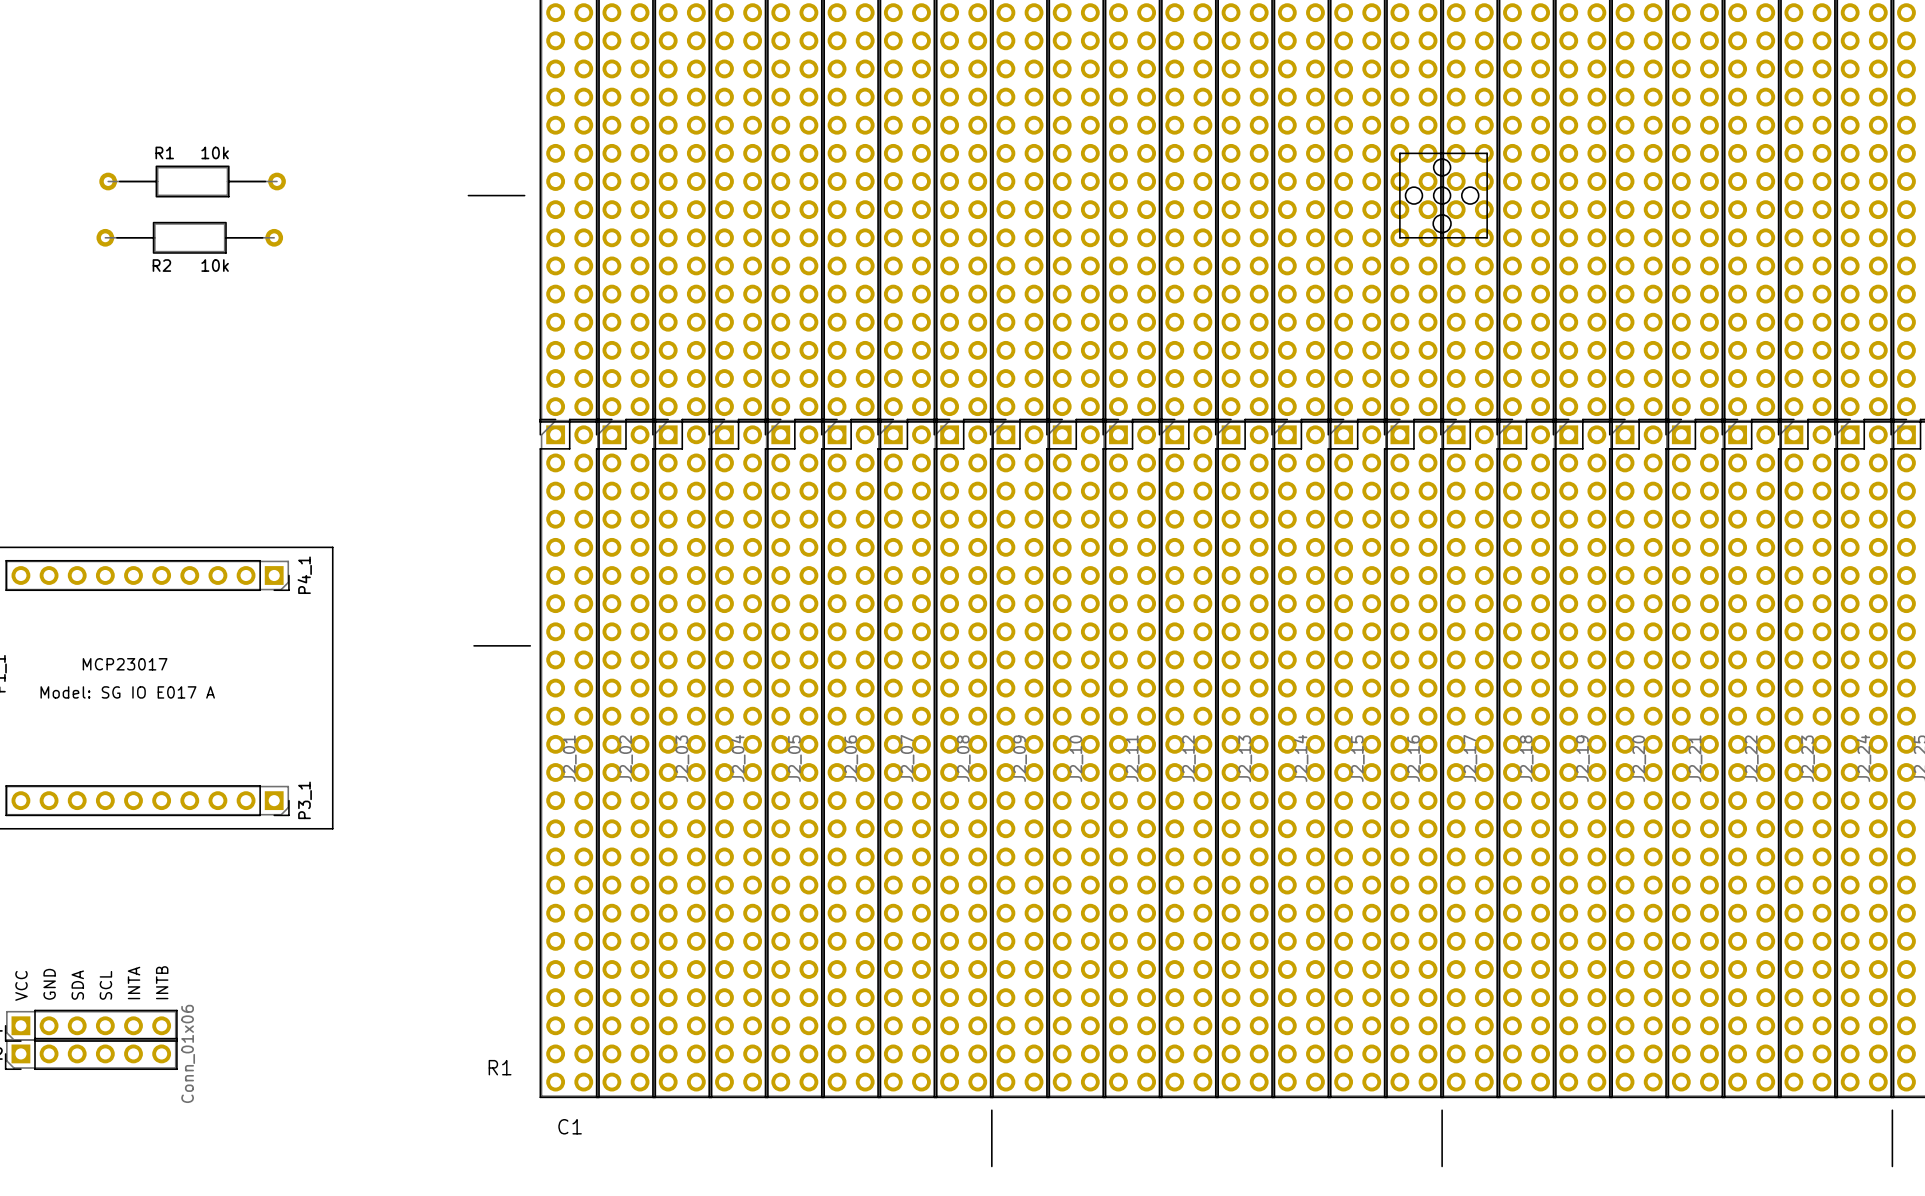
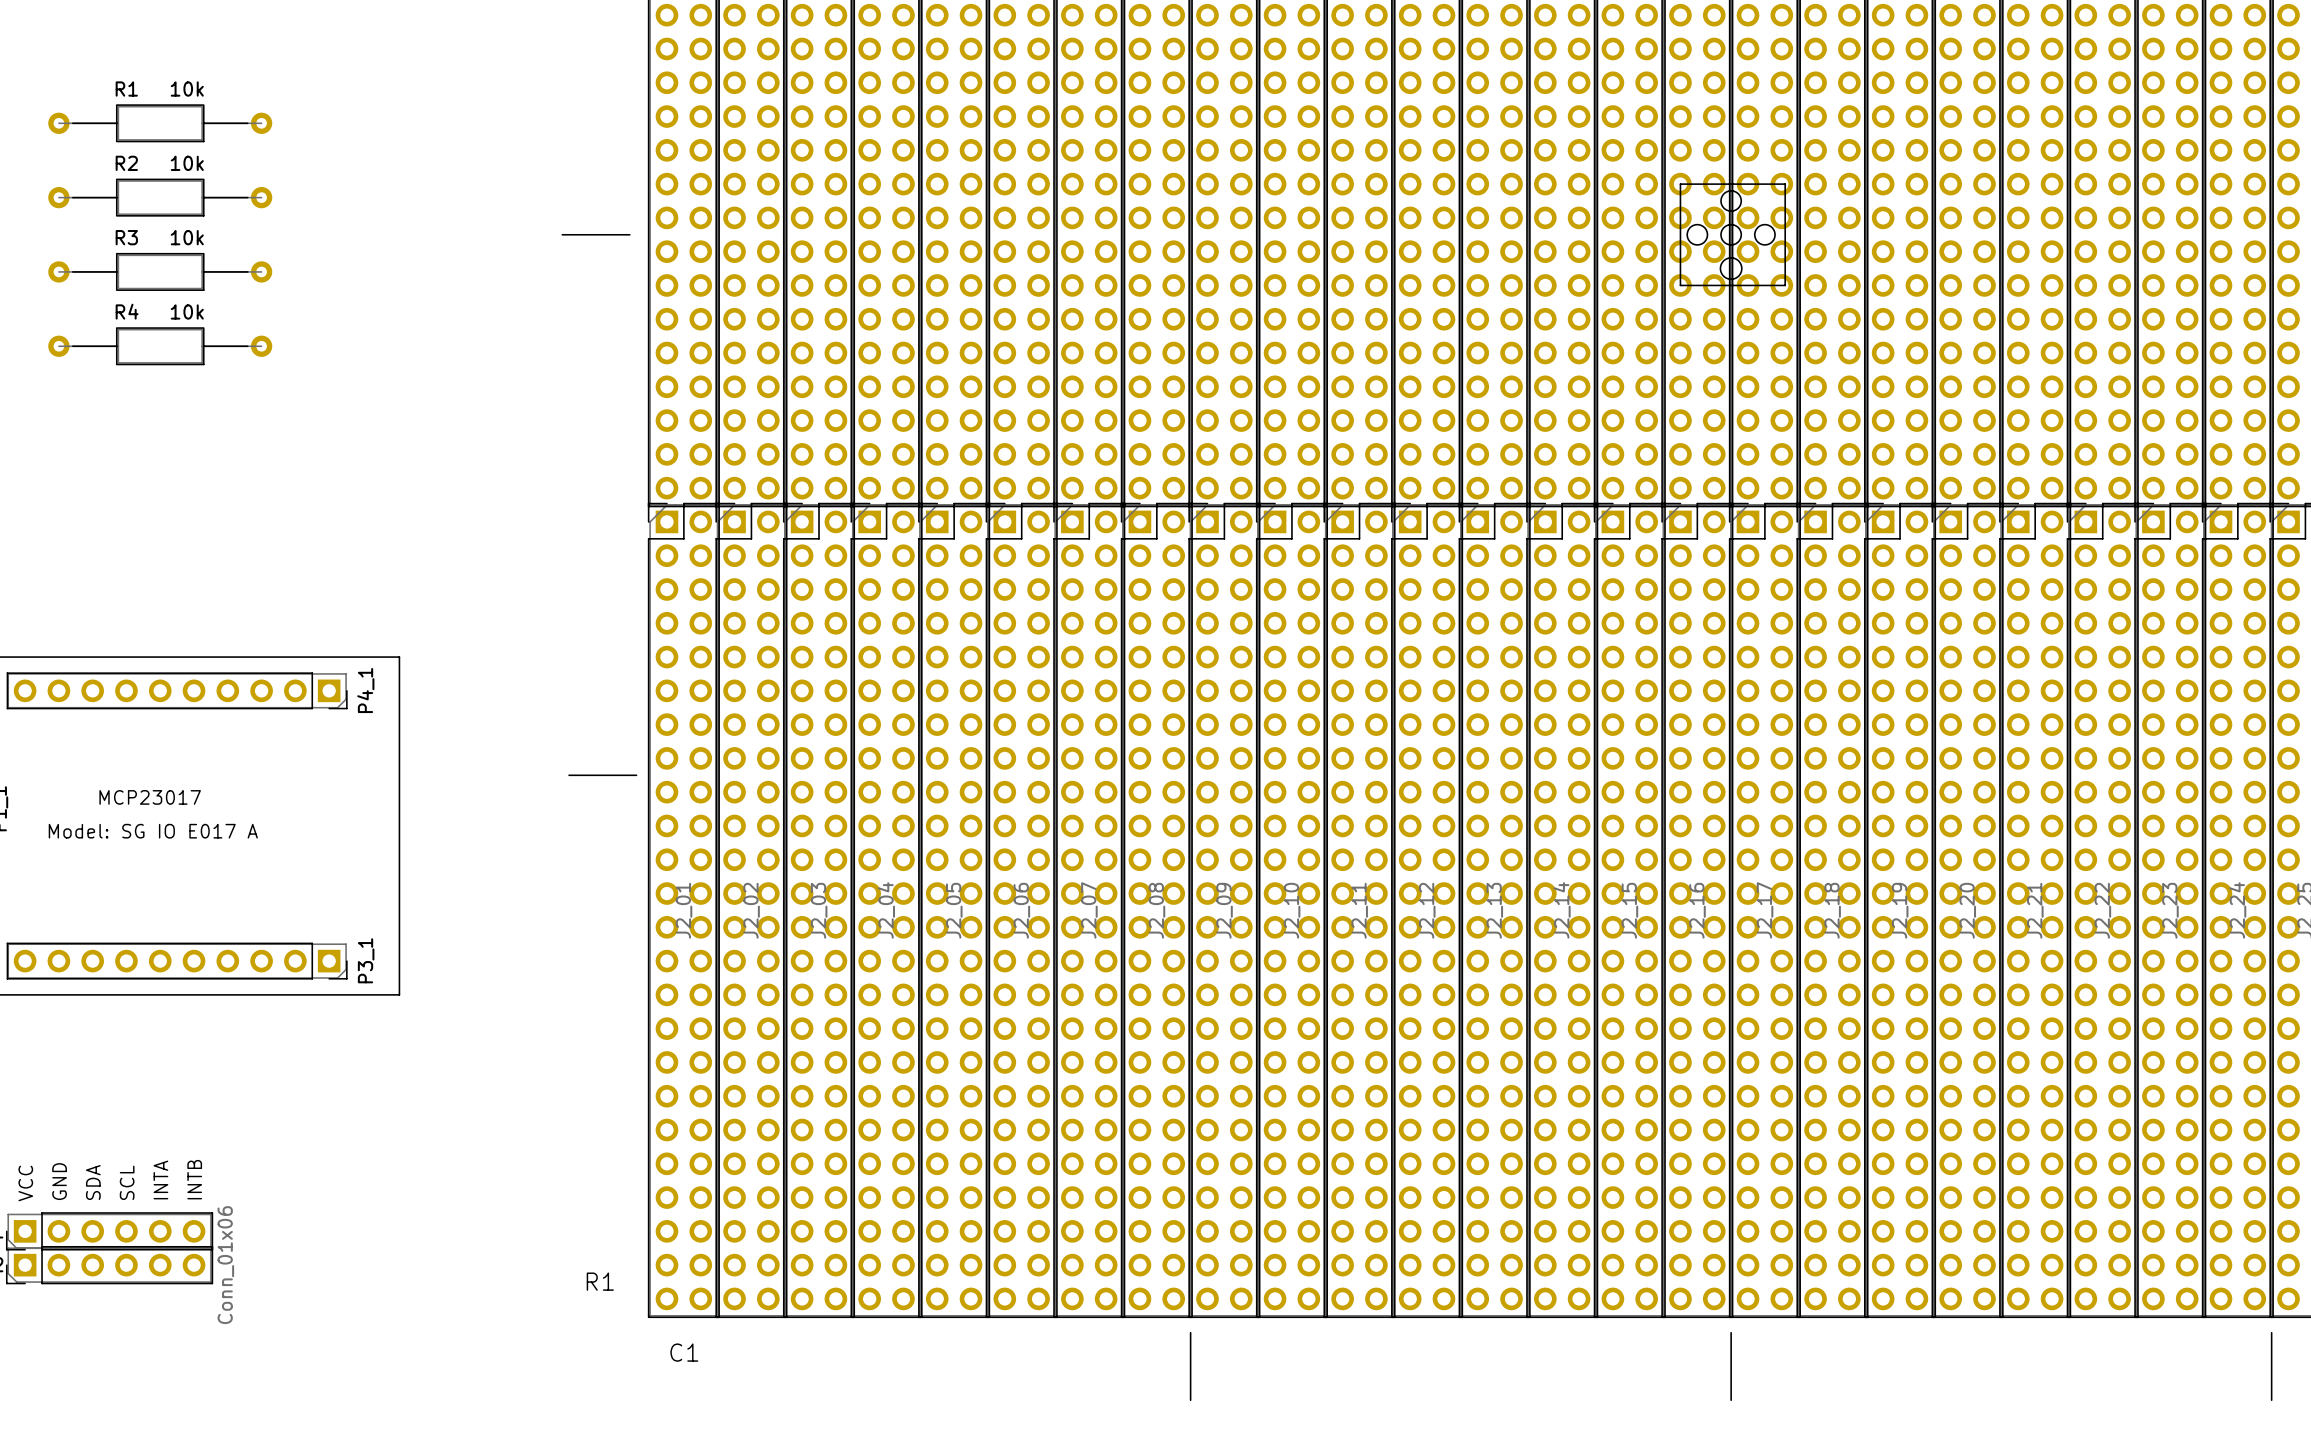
R1 position: (192, 181) -> (160, 123)
R3: none -> 10k (160, 271)
R2 position: (189, 237) -> (160, 197)
R2 name position: R2 (161, 265) -> R2 (126, 163)
R2 value position: 10k (215, 265) -> 10k (187, 163)
R4: none -> 10k (160, 346)

